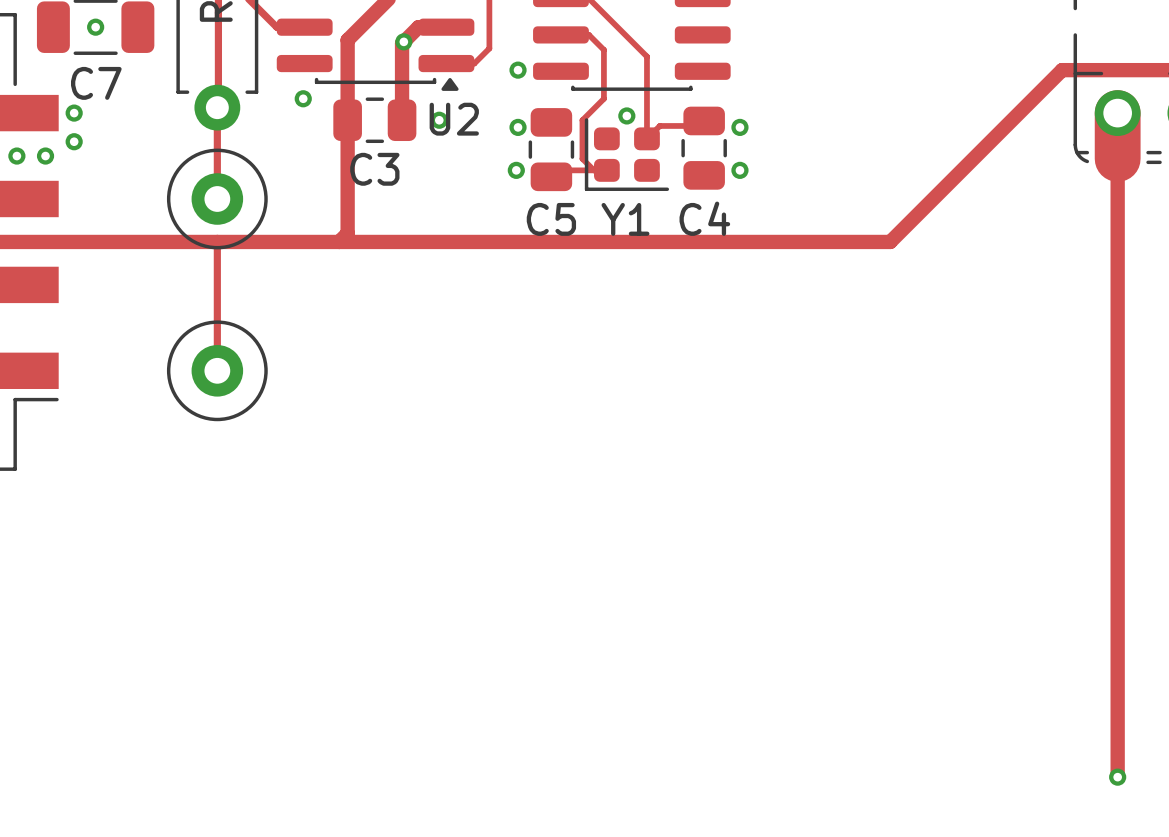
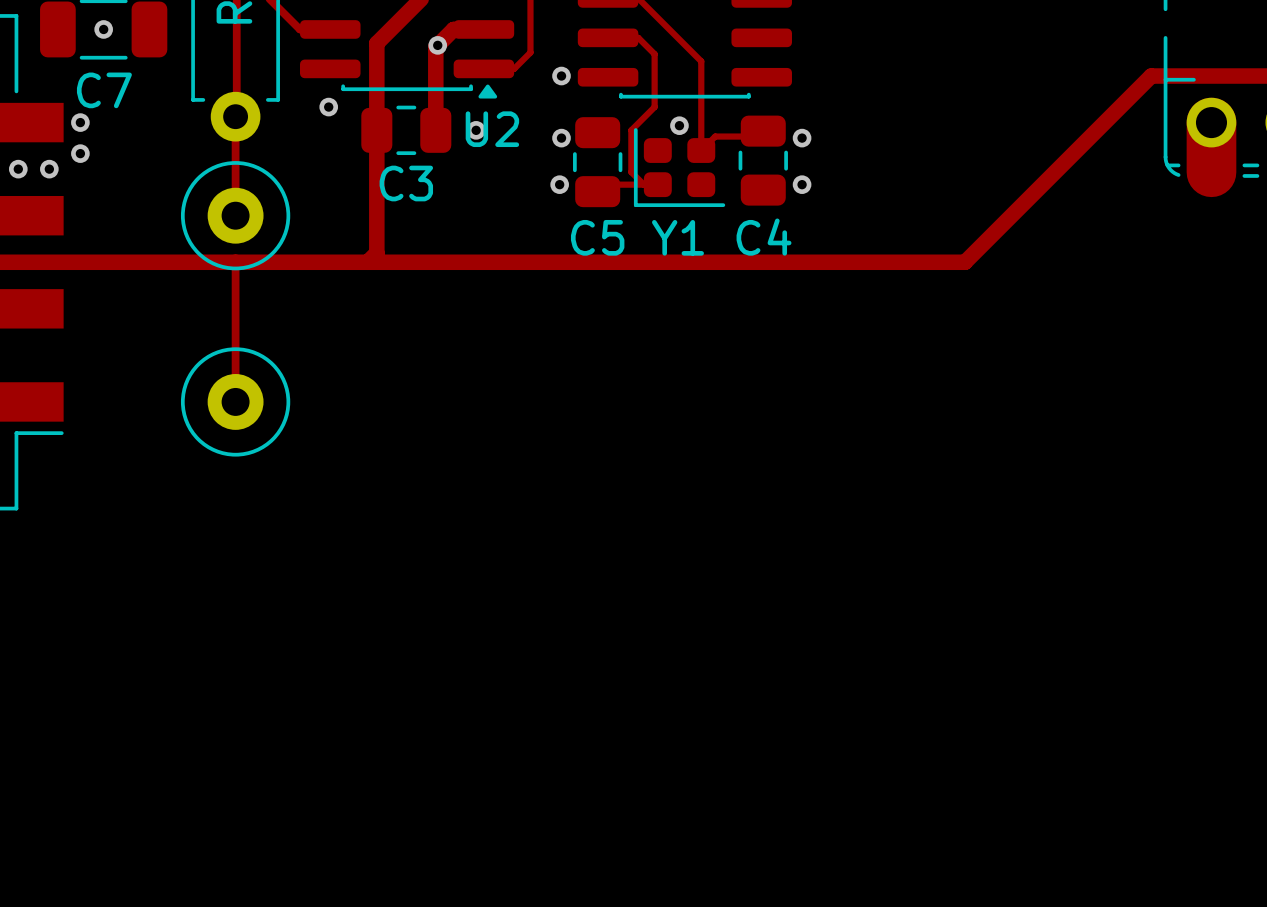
track: (1117, 136) (1117, 777) -> none
via: (1117, 777) -> none

